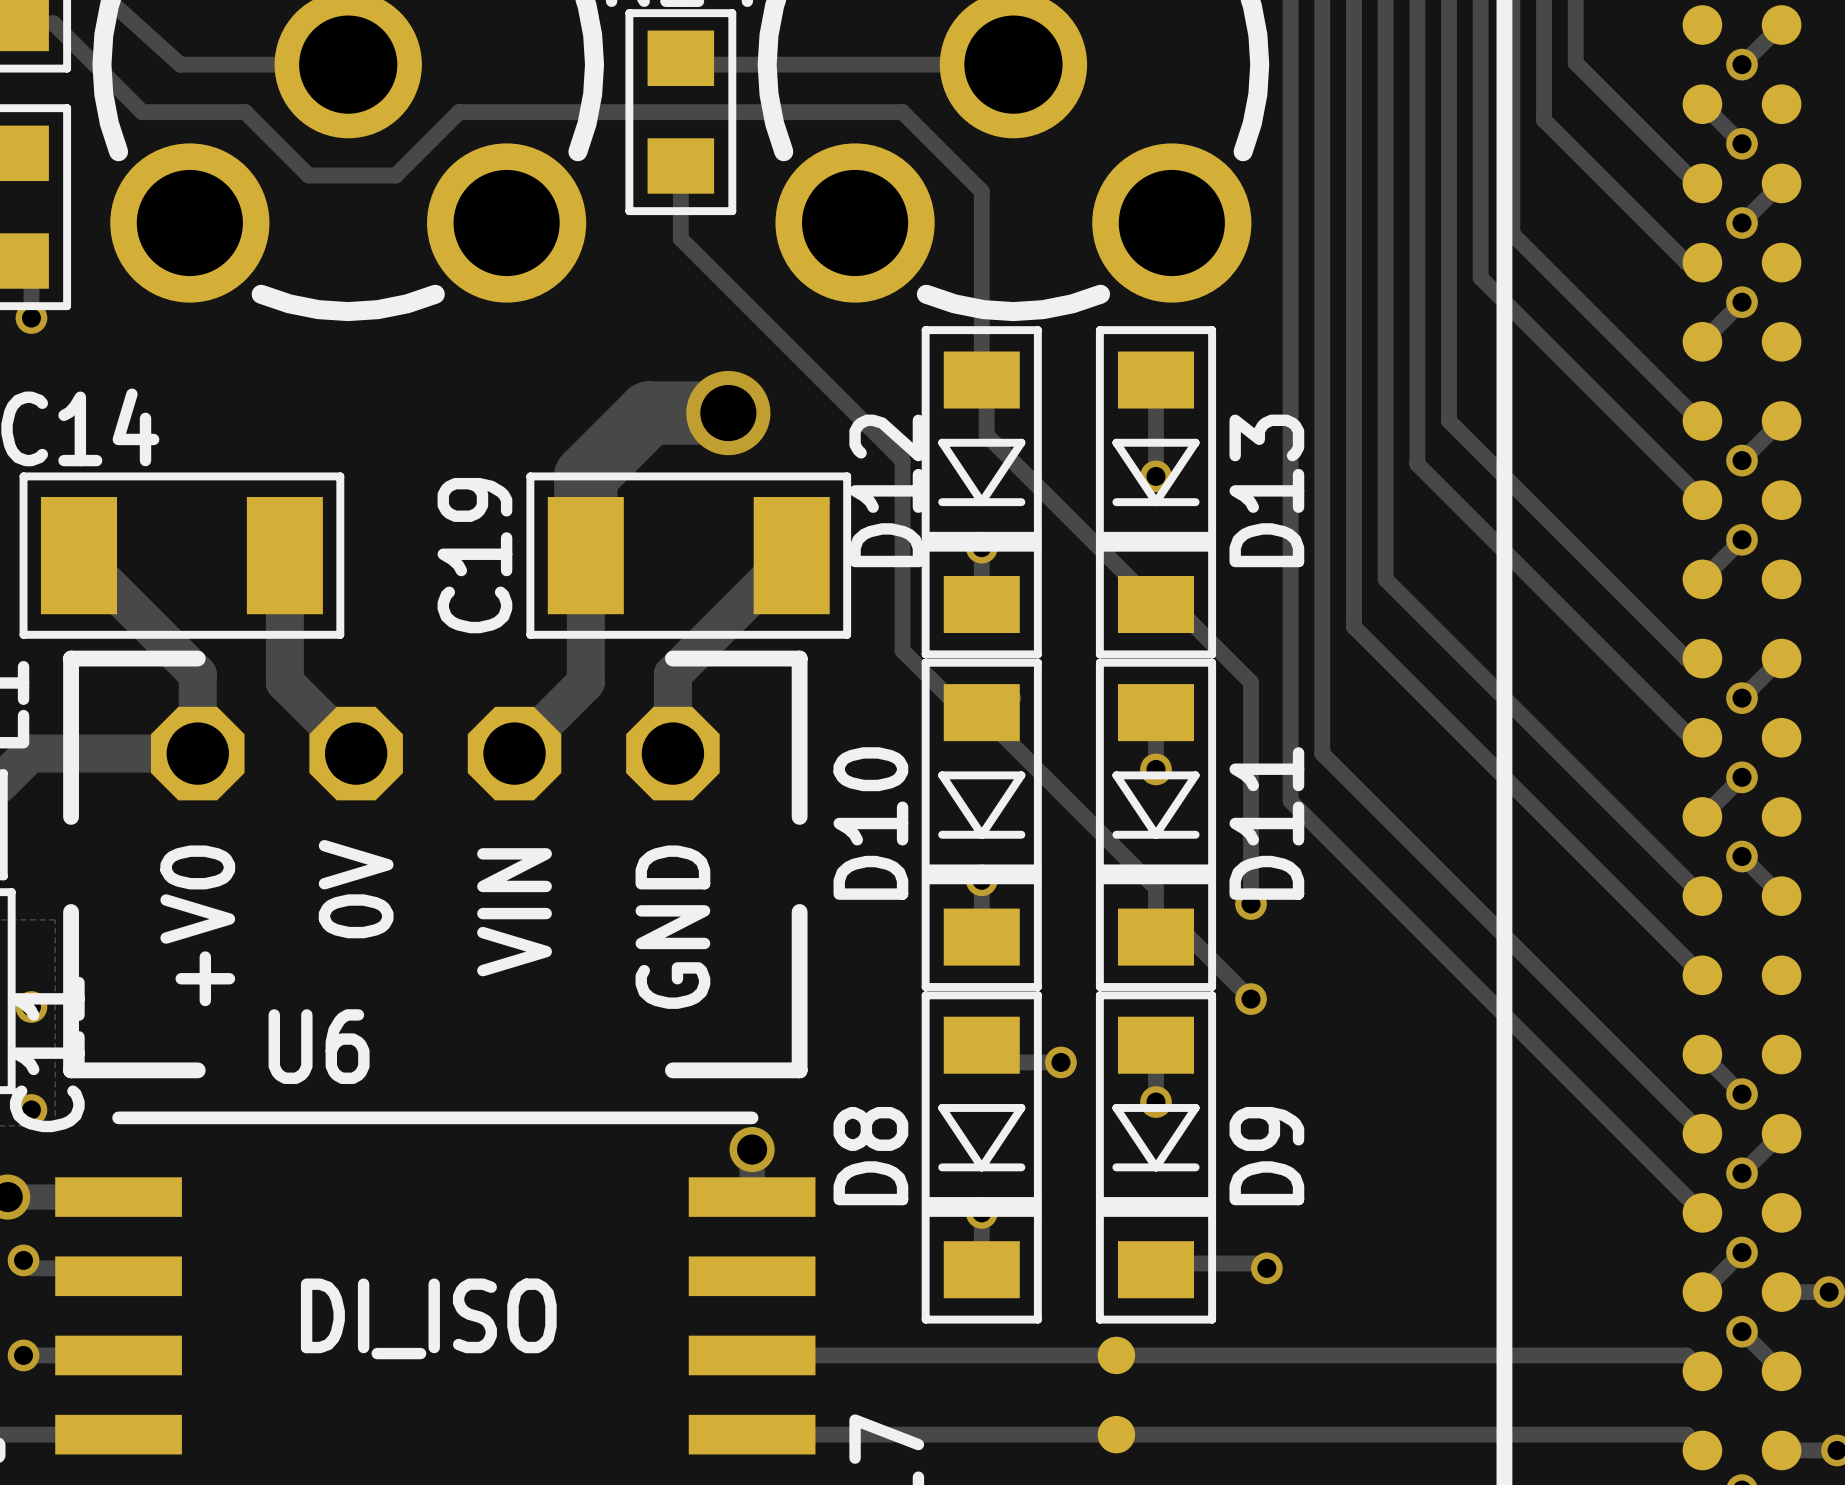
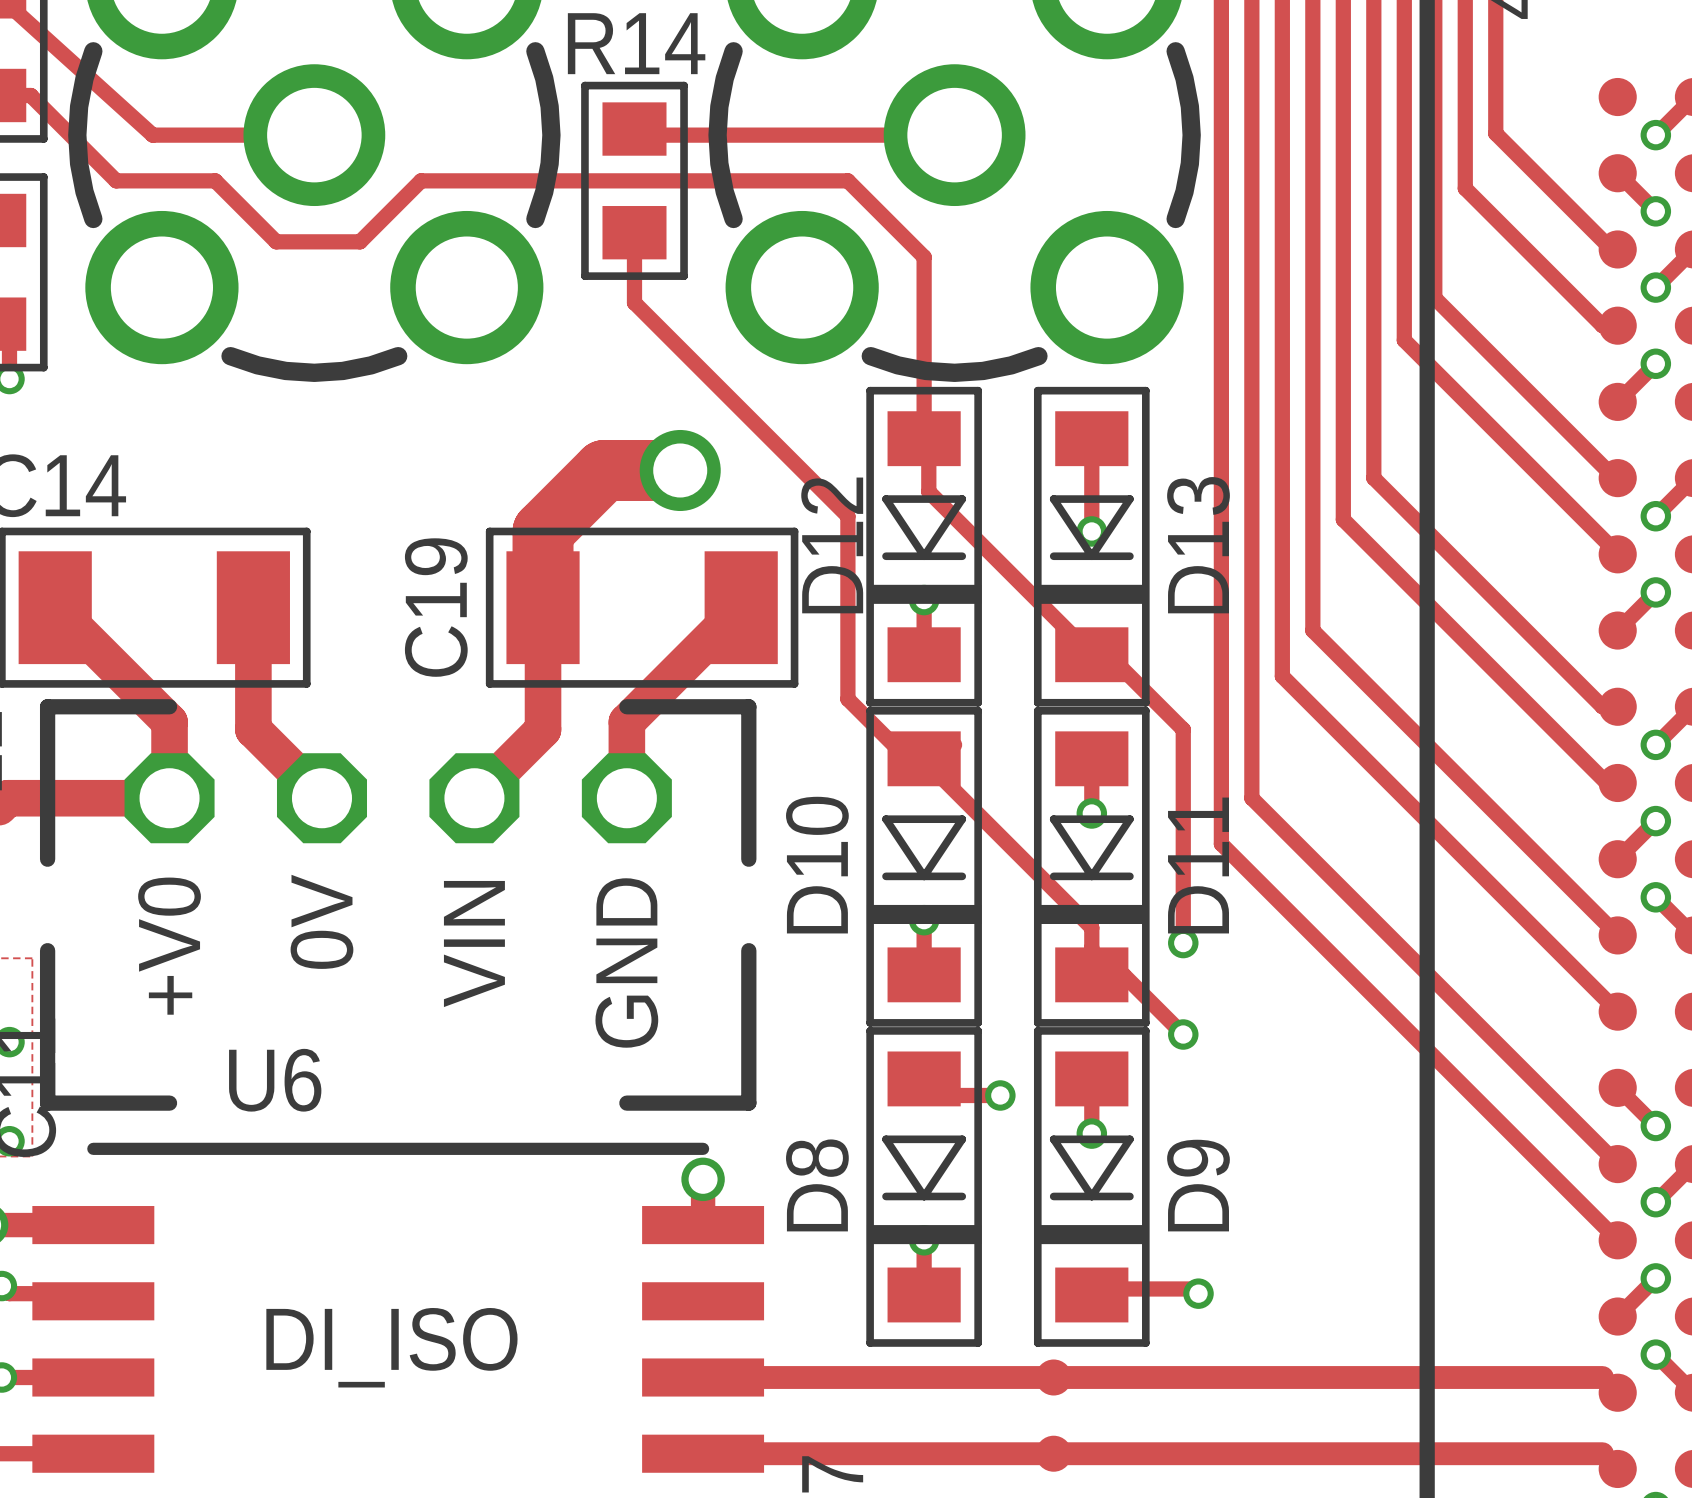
track width: thin (752, 1355) (1686, 1355) -> thick (703, 1377) (1602, 1377)
track width: thin (752, 1434) (1686, 1434) -> thick (703, 1453) (1602, 1453)

